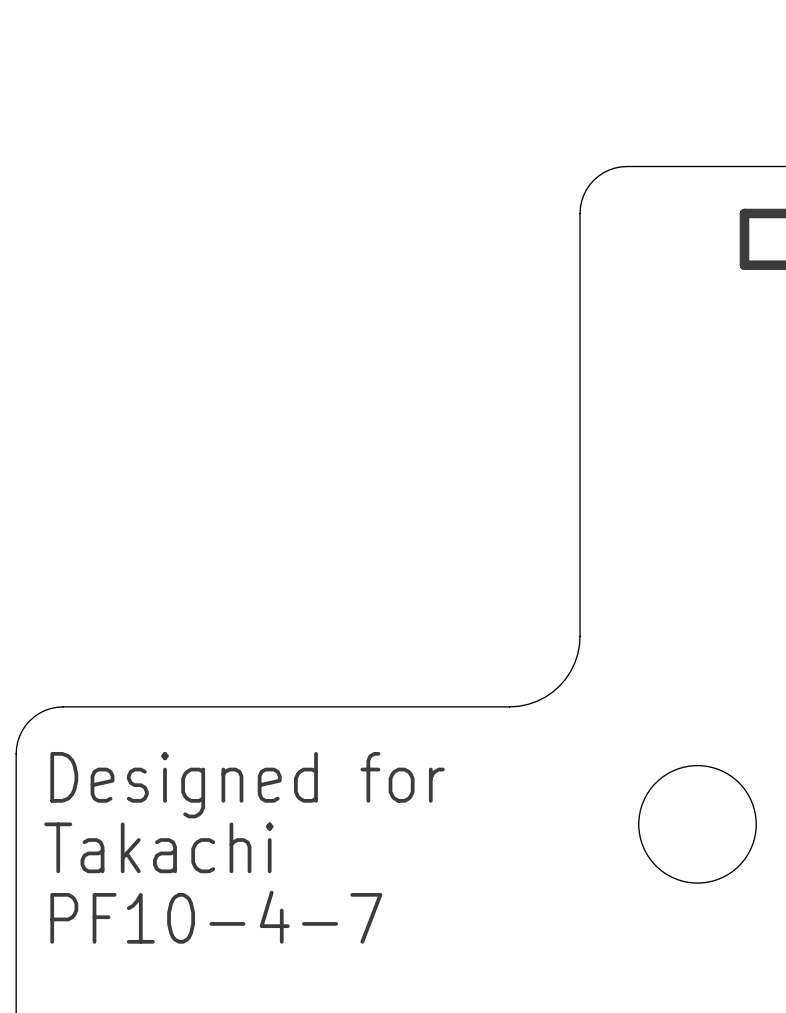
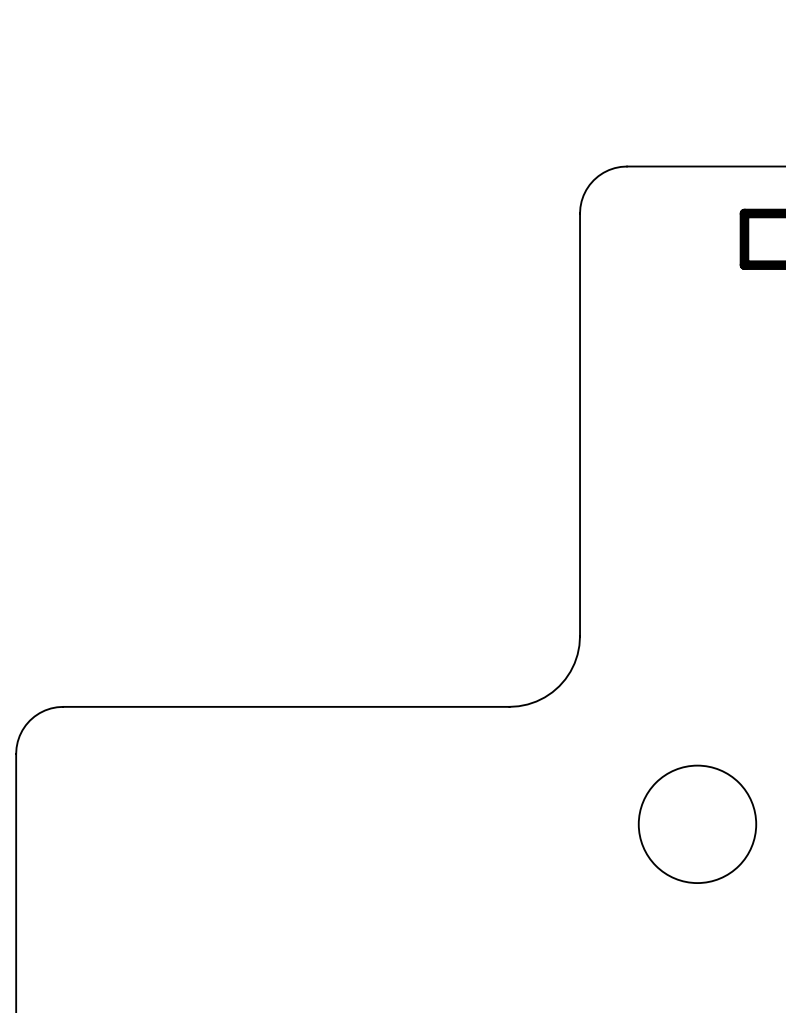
text: Designed for (247, 785) -> none
text: Takachi (158, 847) -> none
text: PF10-4-7 (216, 917) -> none

